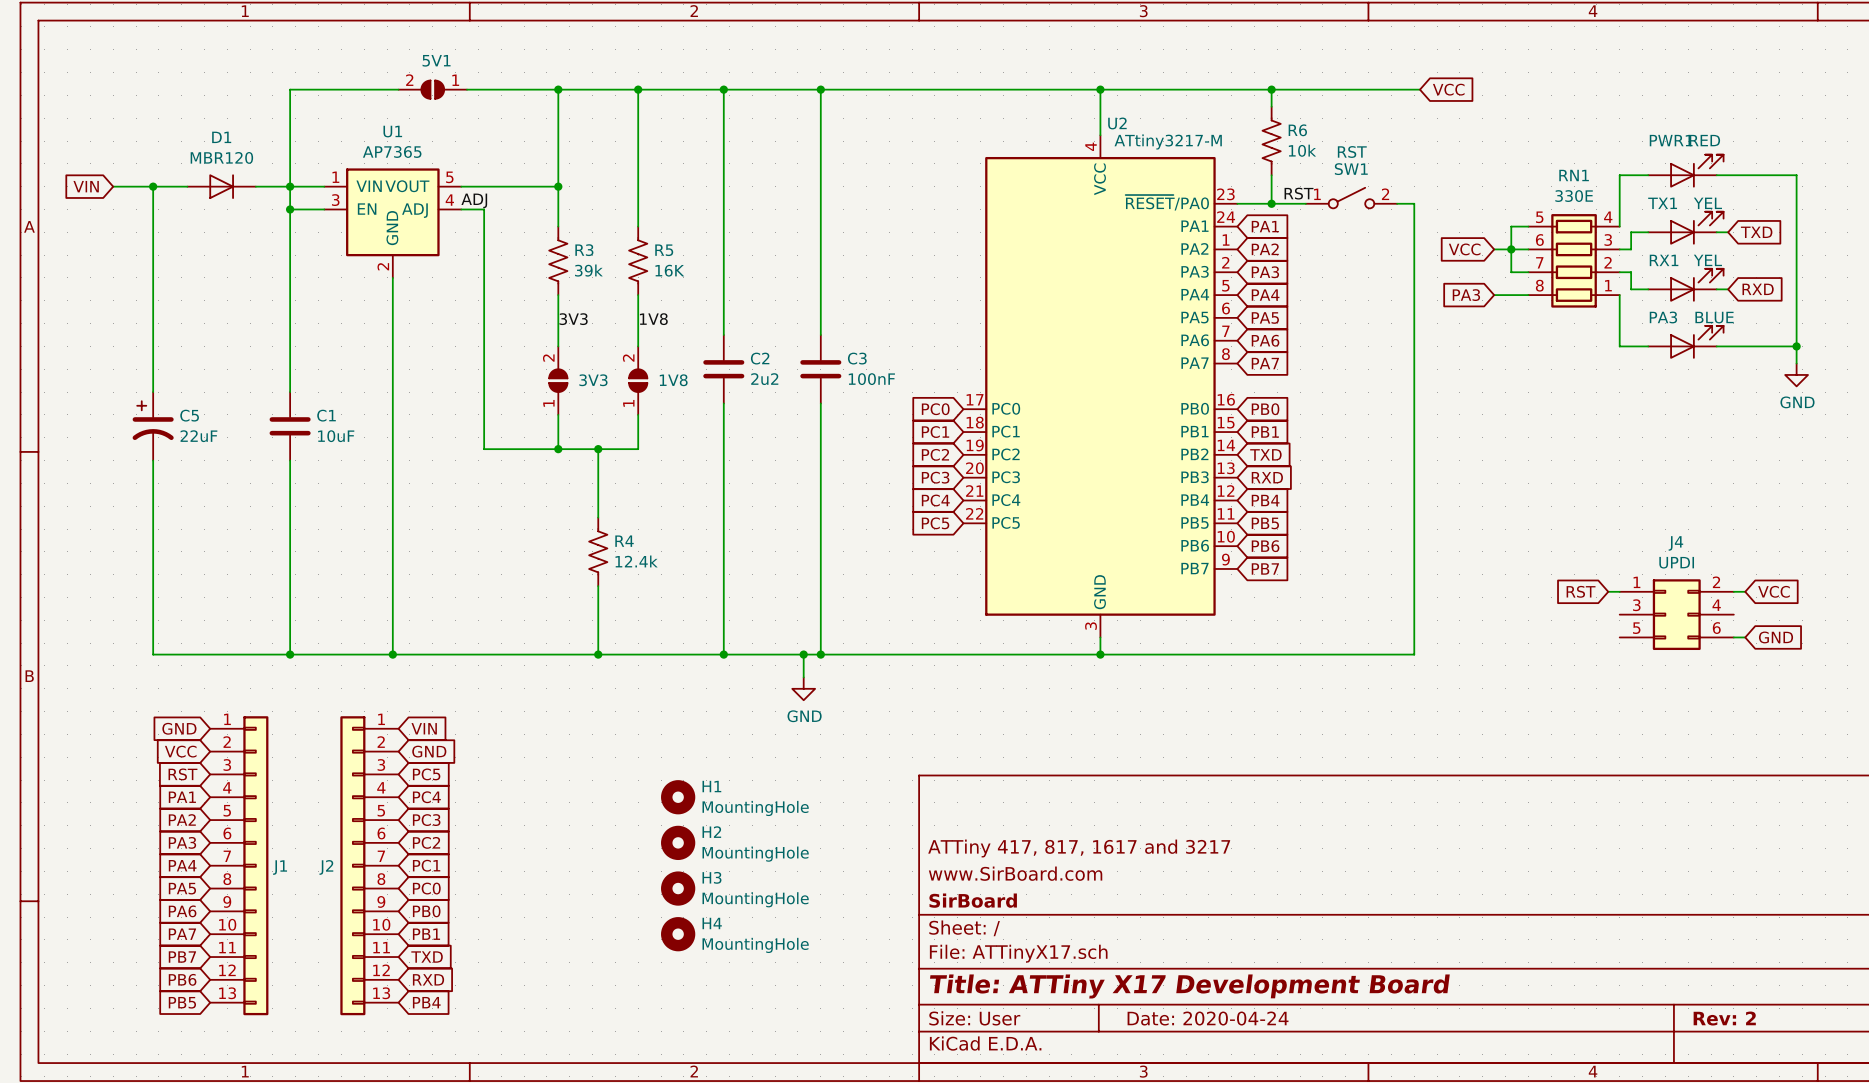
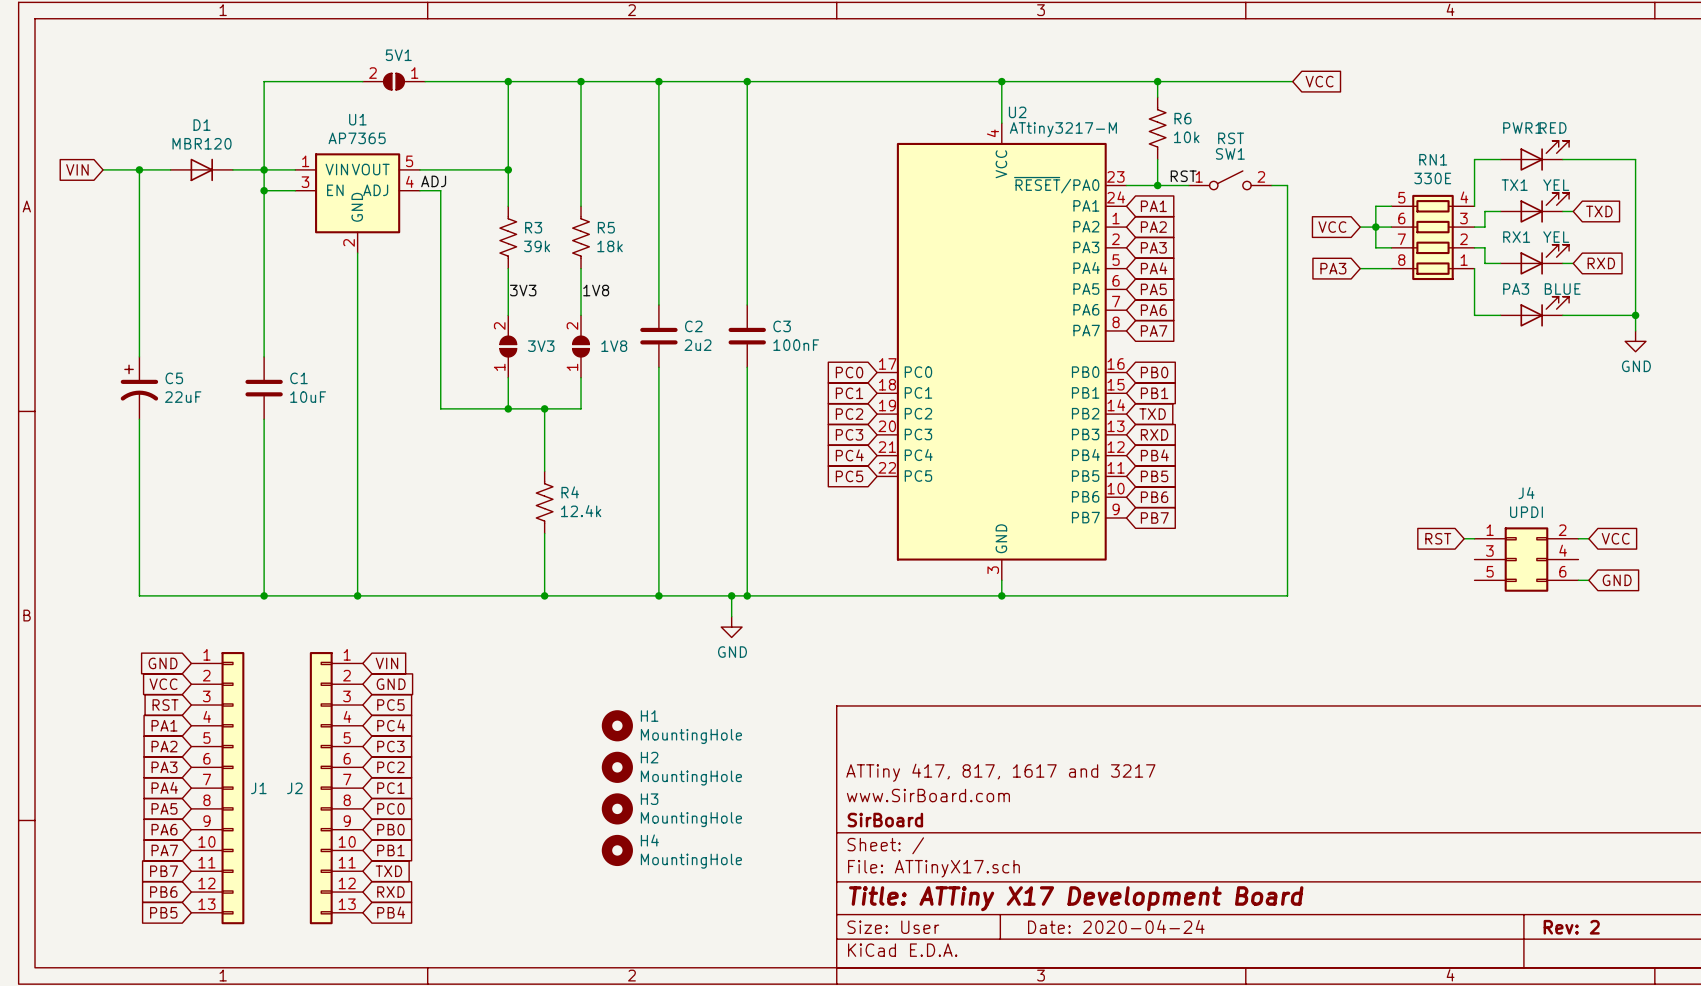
R5 value: 16K (669, 270) -> 18k (610, 246)

